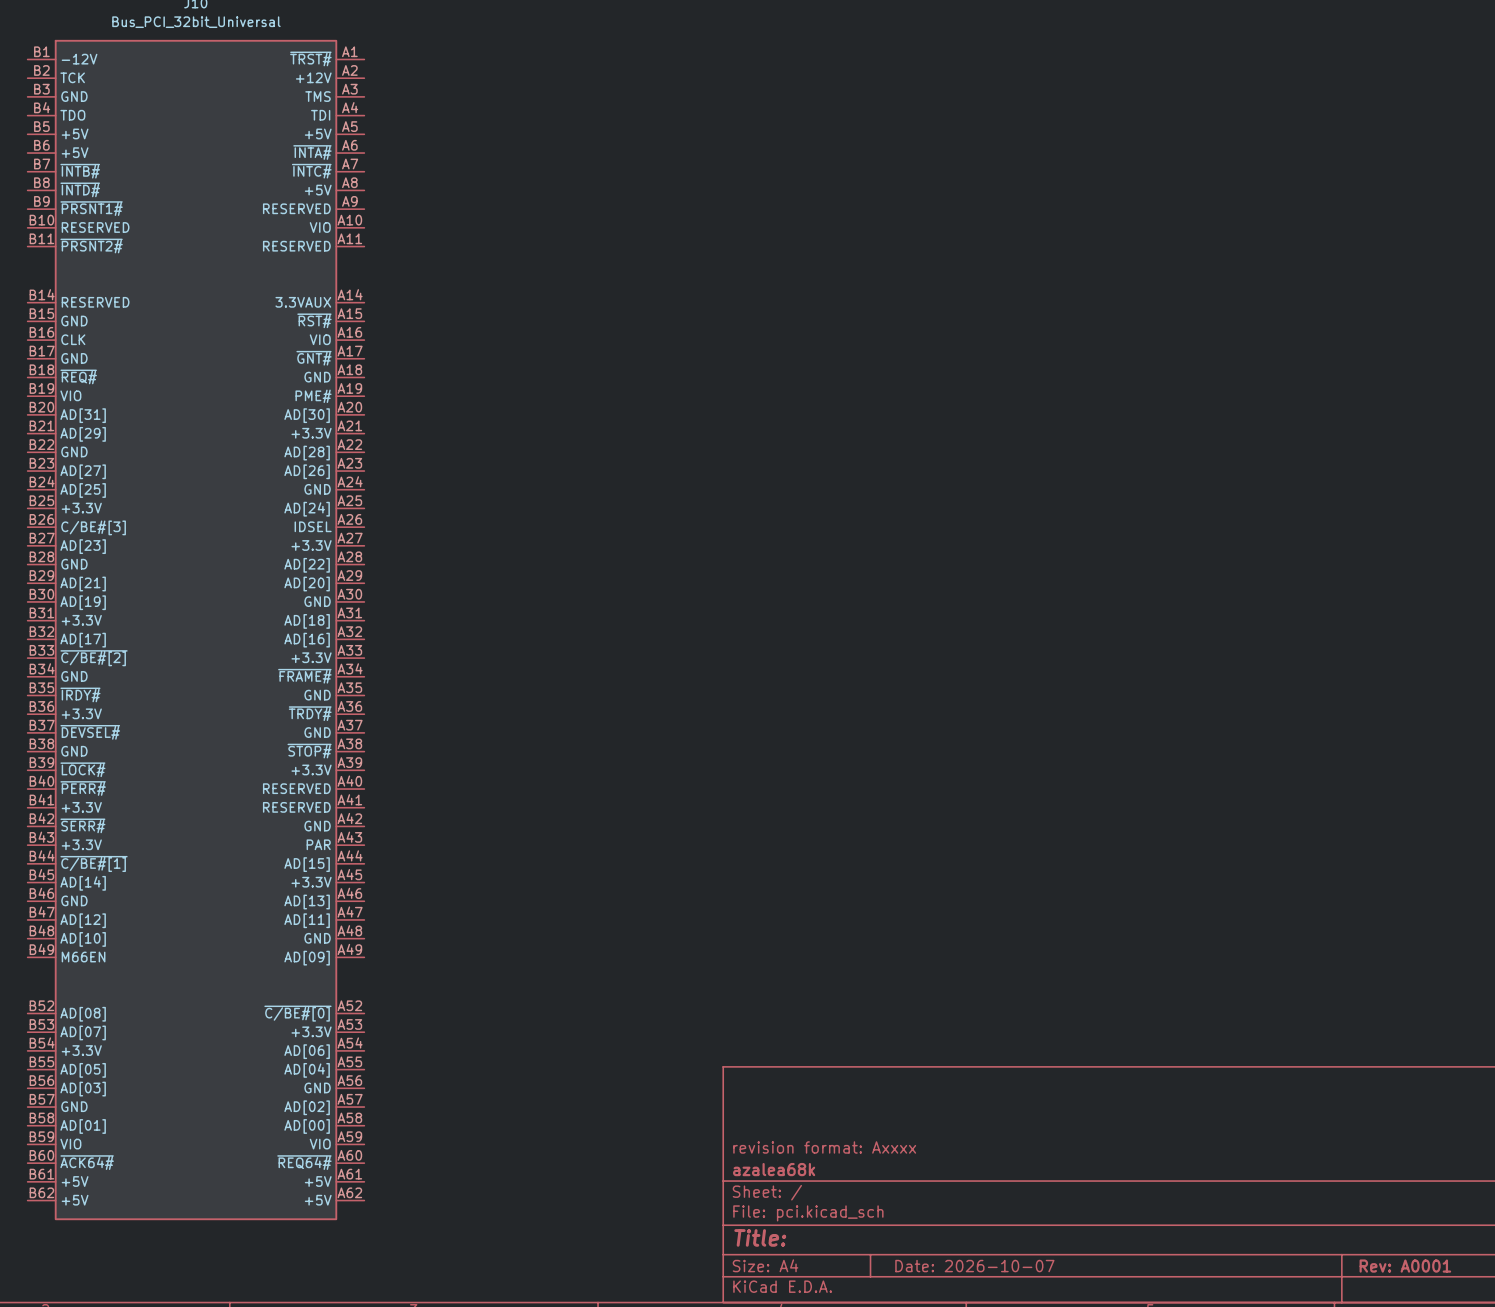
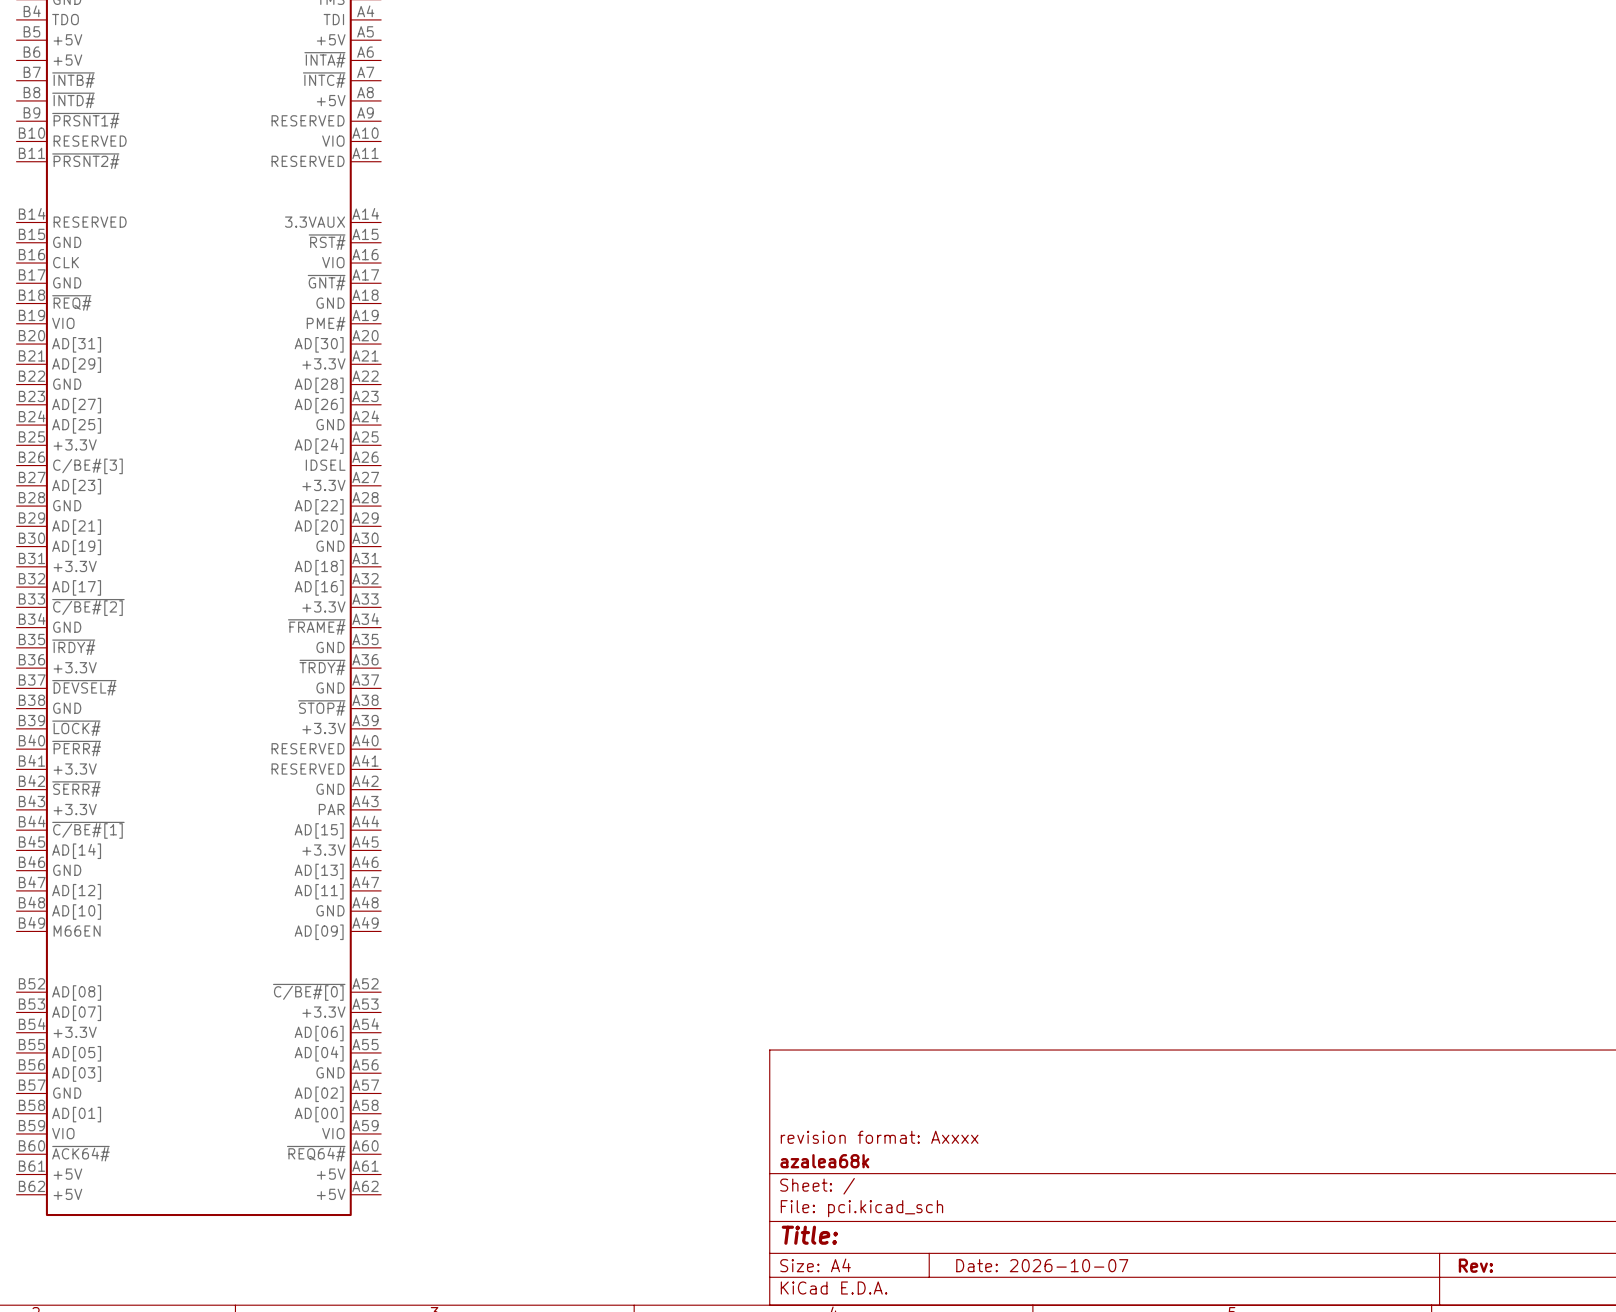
title block: Rev: A0001 (1405, 1266) -> Rev: (1475, 1265)

